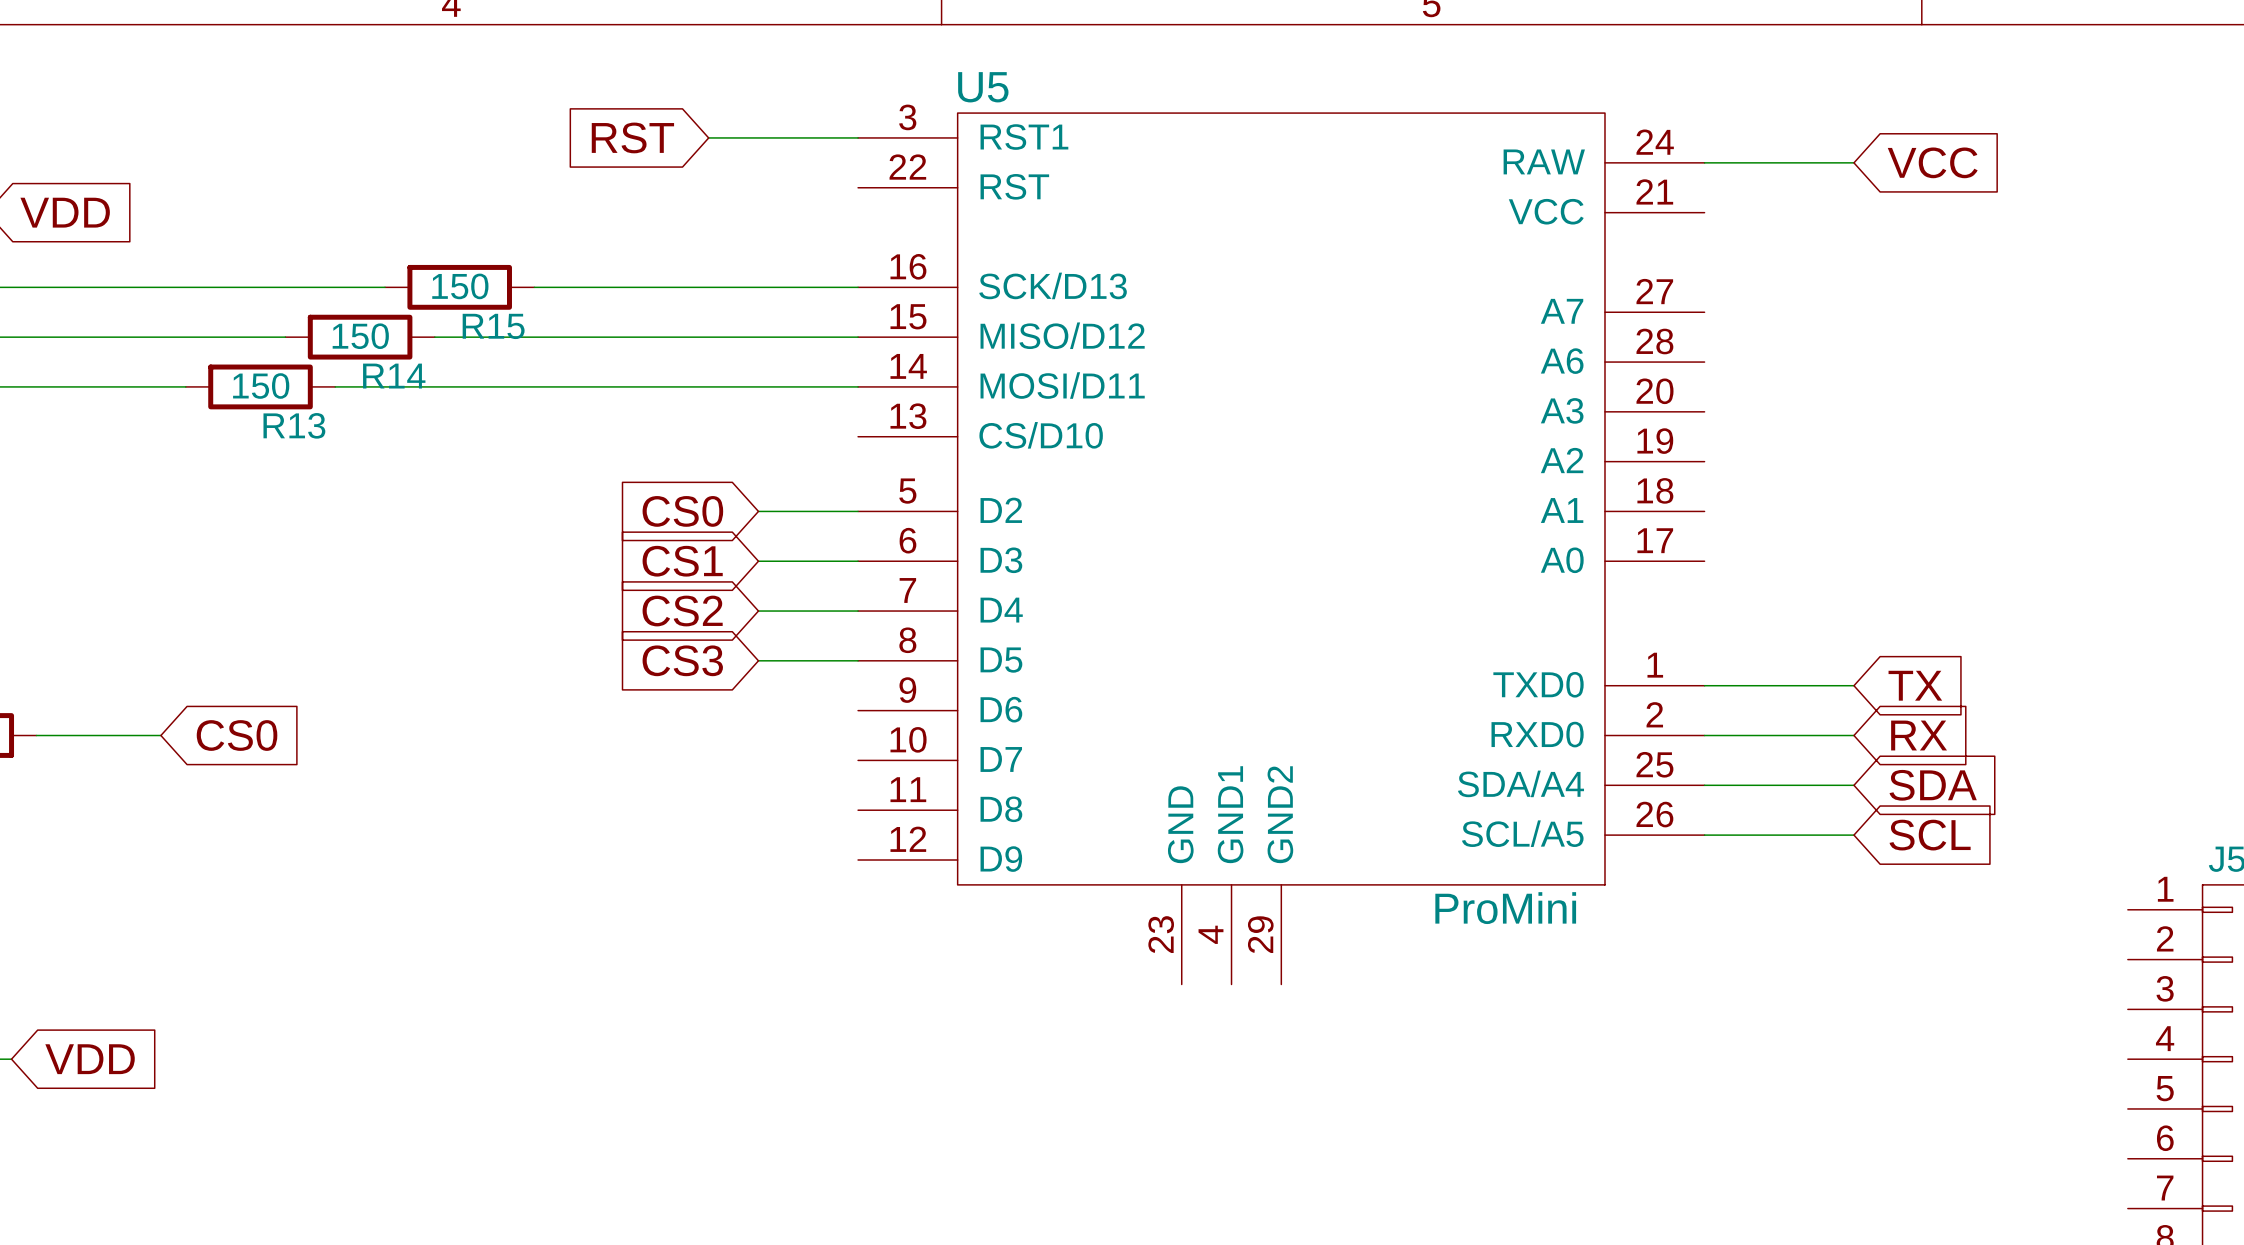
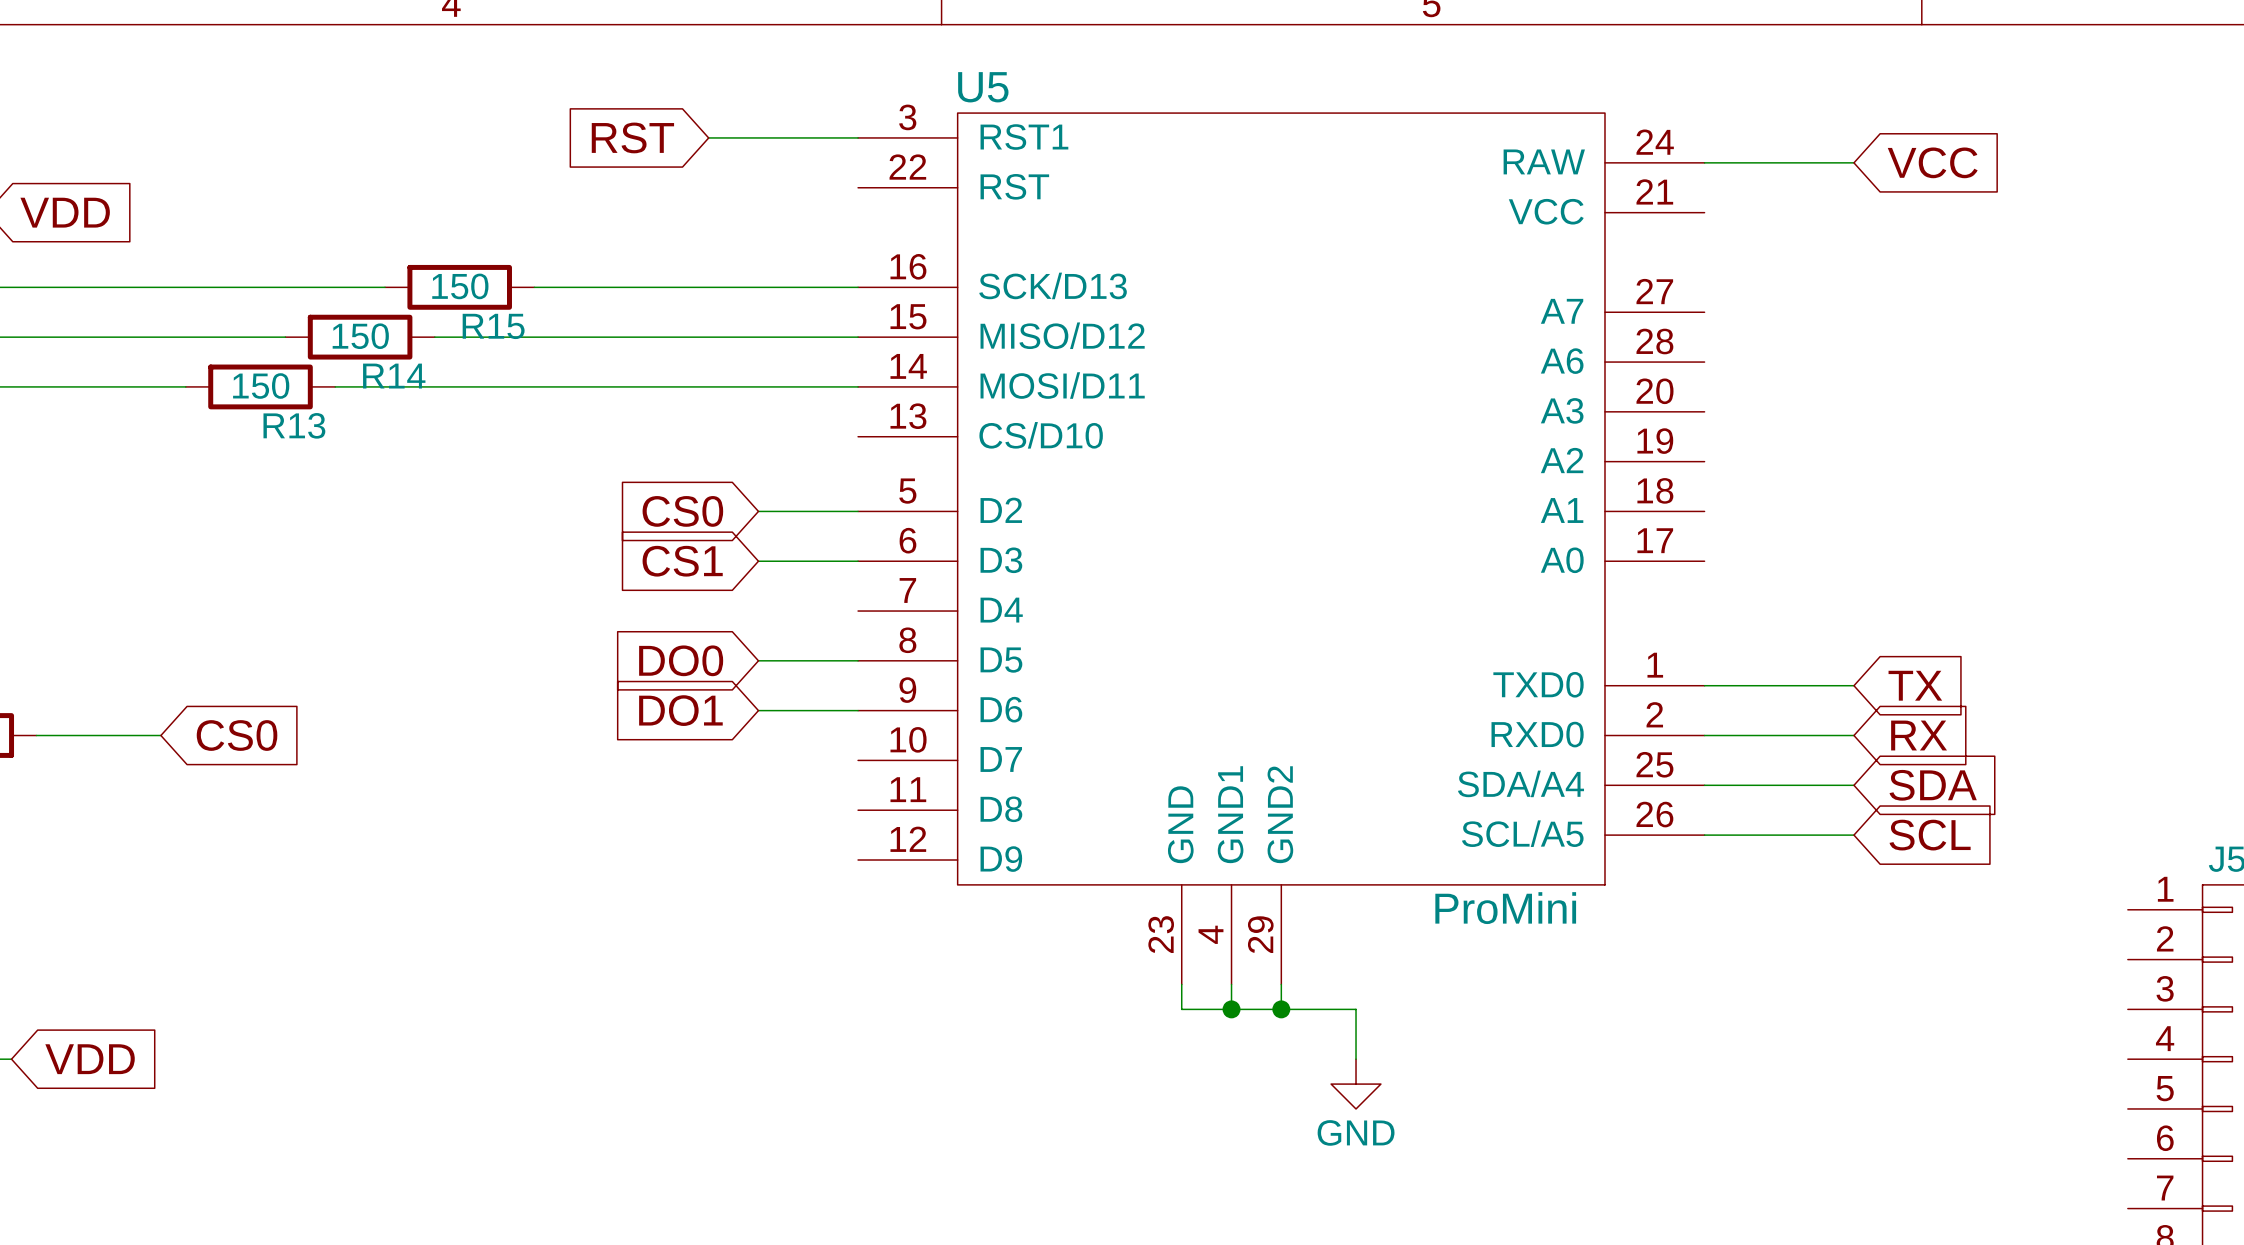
global label: CS2 (682, 611) -> none
wire: (758, 611) (858, 611) -> (758, 710) (858, 710)
global label: CS3 (682, 660) -> DO0 (681, 660)
global label: none -> DO1 (680, 710)
wire: none -> (1181, 984) (1181, 1009) (1356, 1009) (1356, 1059)
wire: none -> (1231, 984) (1231, 1009)
wire: none -> (1281, 984) (1281, 1009)
junction: none -> (1231, 1009)
junction: none -> (1281, 1009)
power symbol: none -> GND (1356, 1084)

